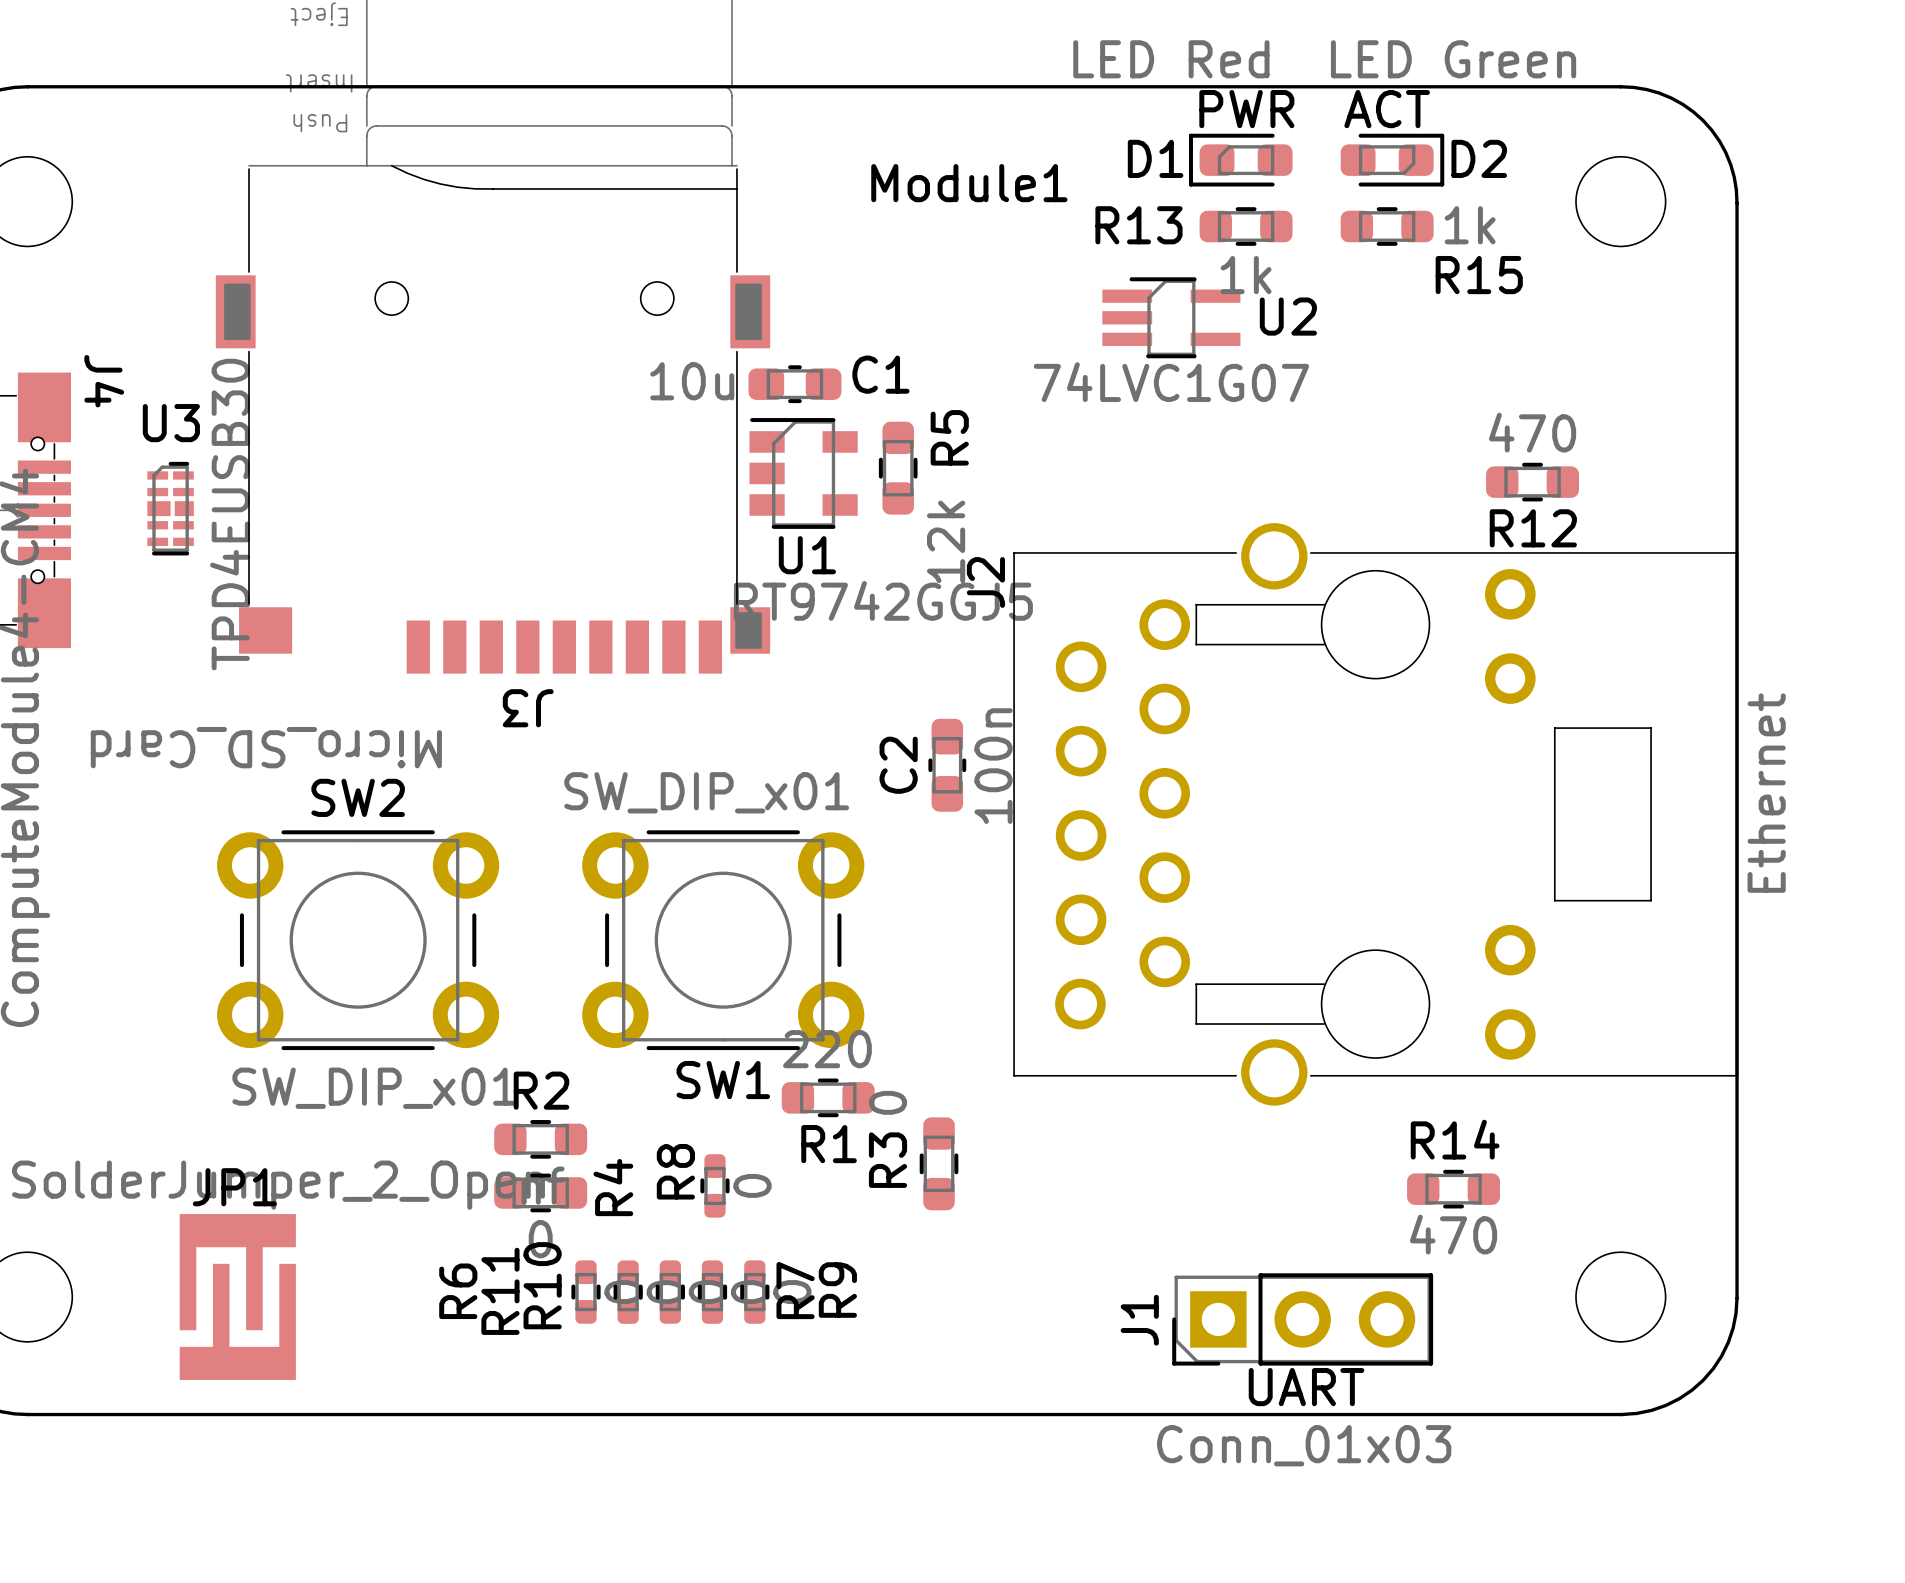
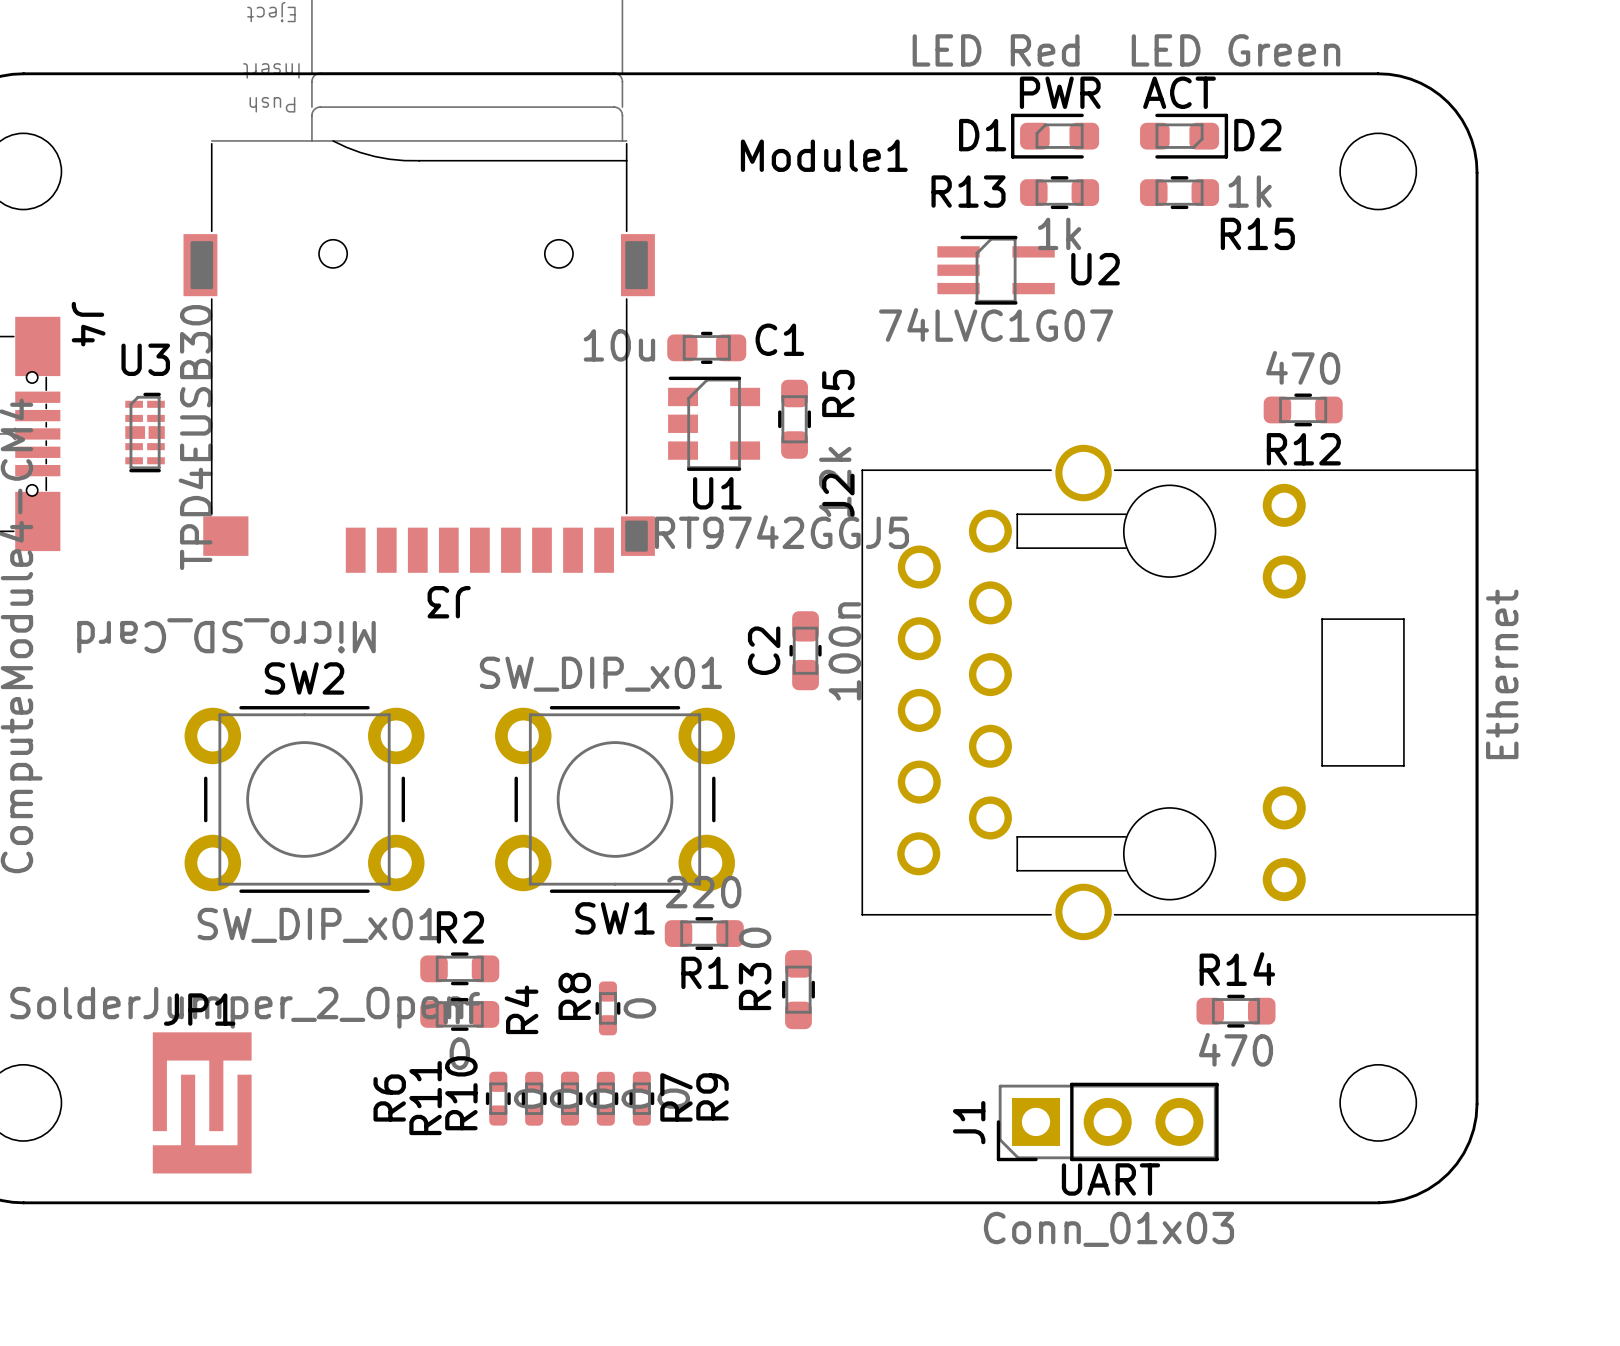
C1 position: (794, 384) -> (706, 347)
R5 position: (898, 468) -> (794, 419)
U1 position: (803, 473) -> (714, 423)

